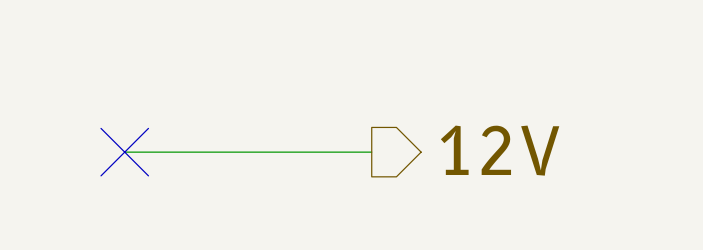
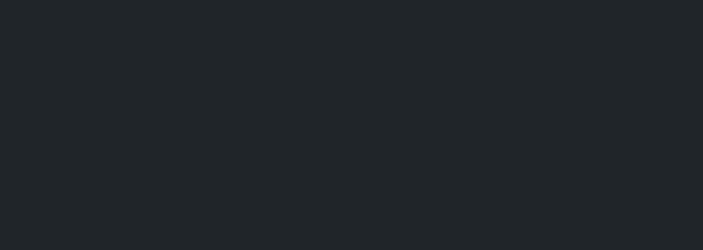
hierarchical label: 12V (500, 150) -> none
wire: (124, 152) (371, 152) -> none
no-connect mark: (124, 152) -> none

